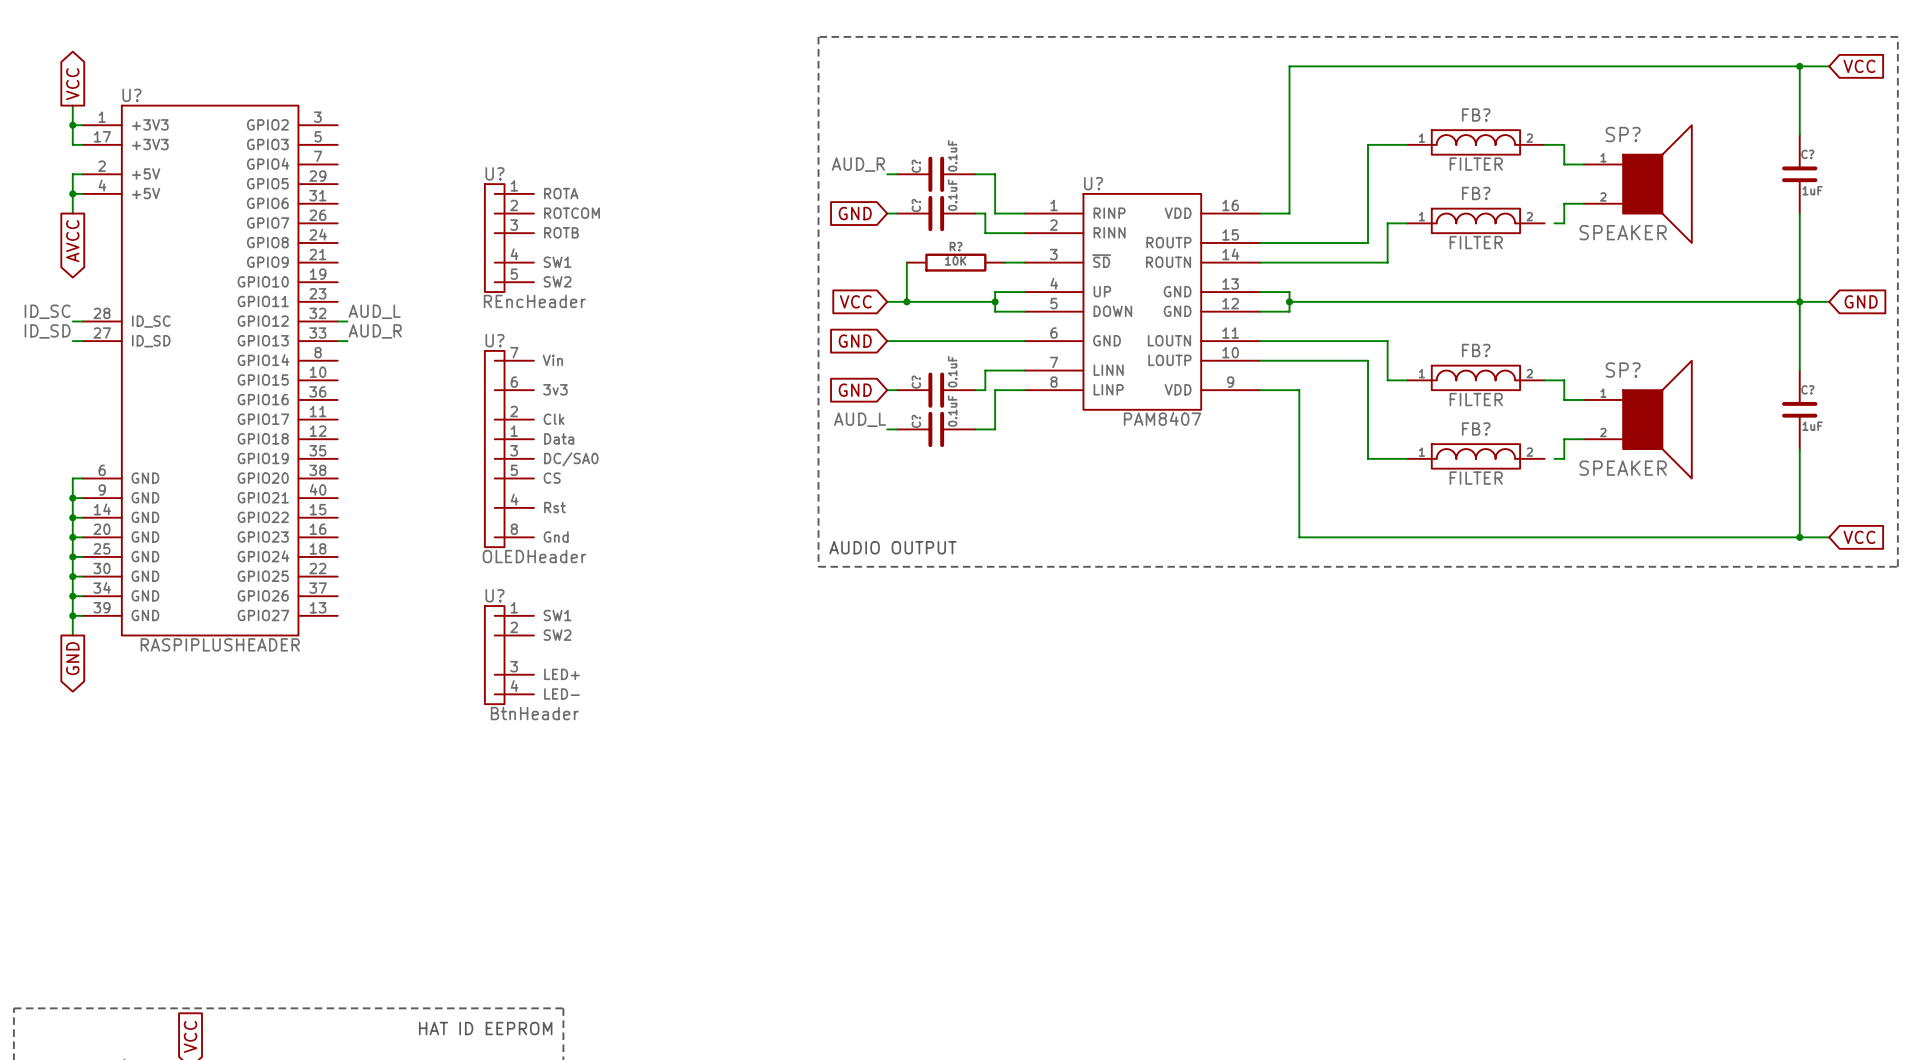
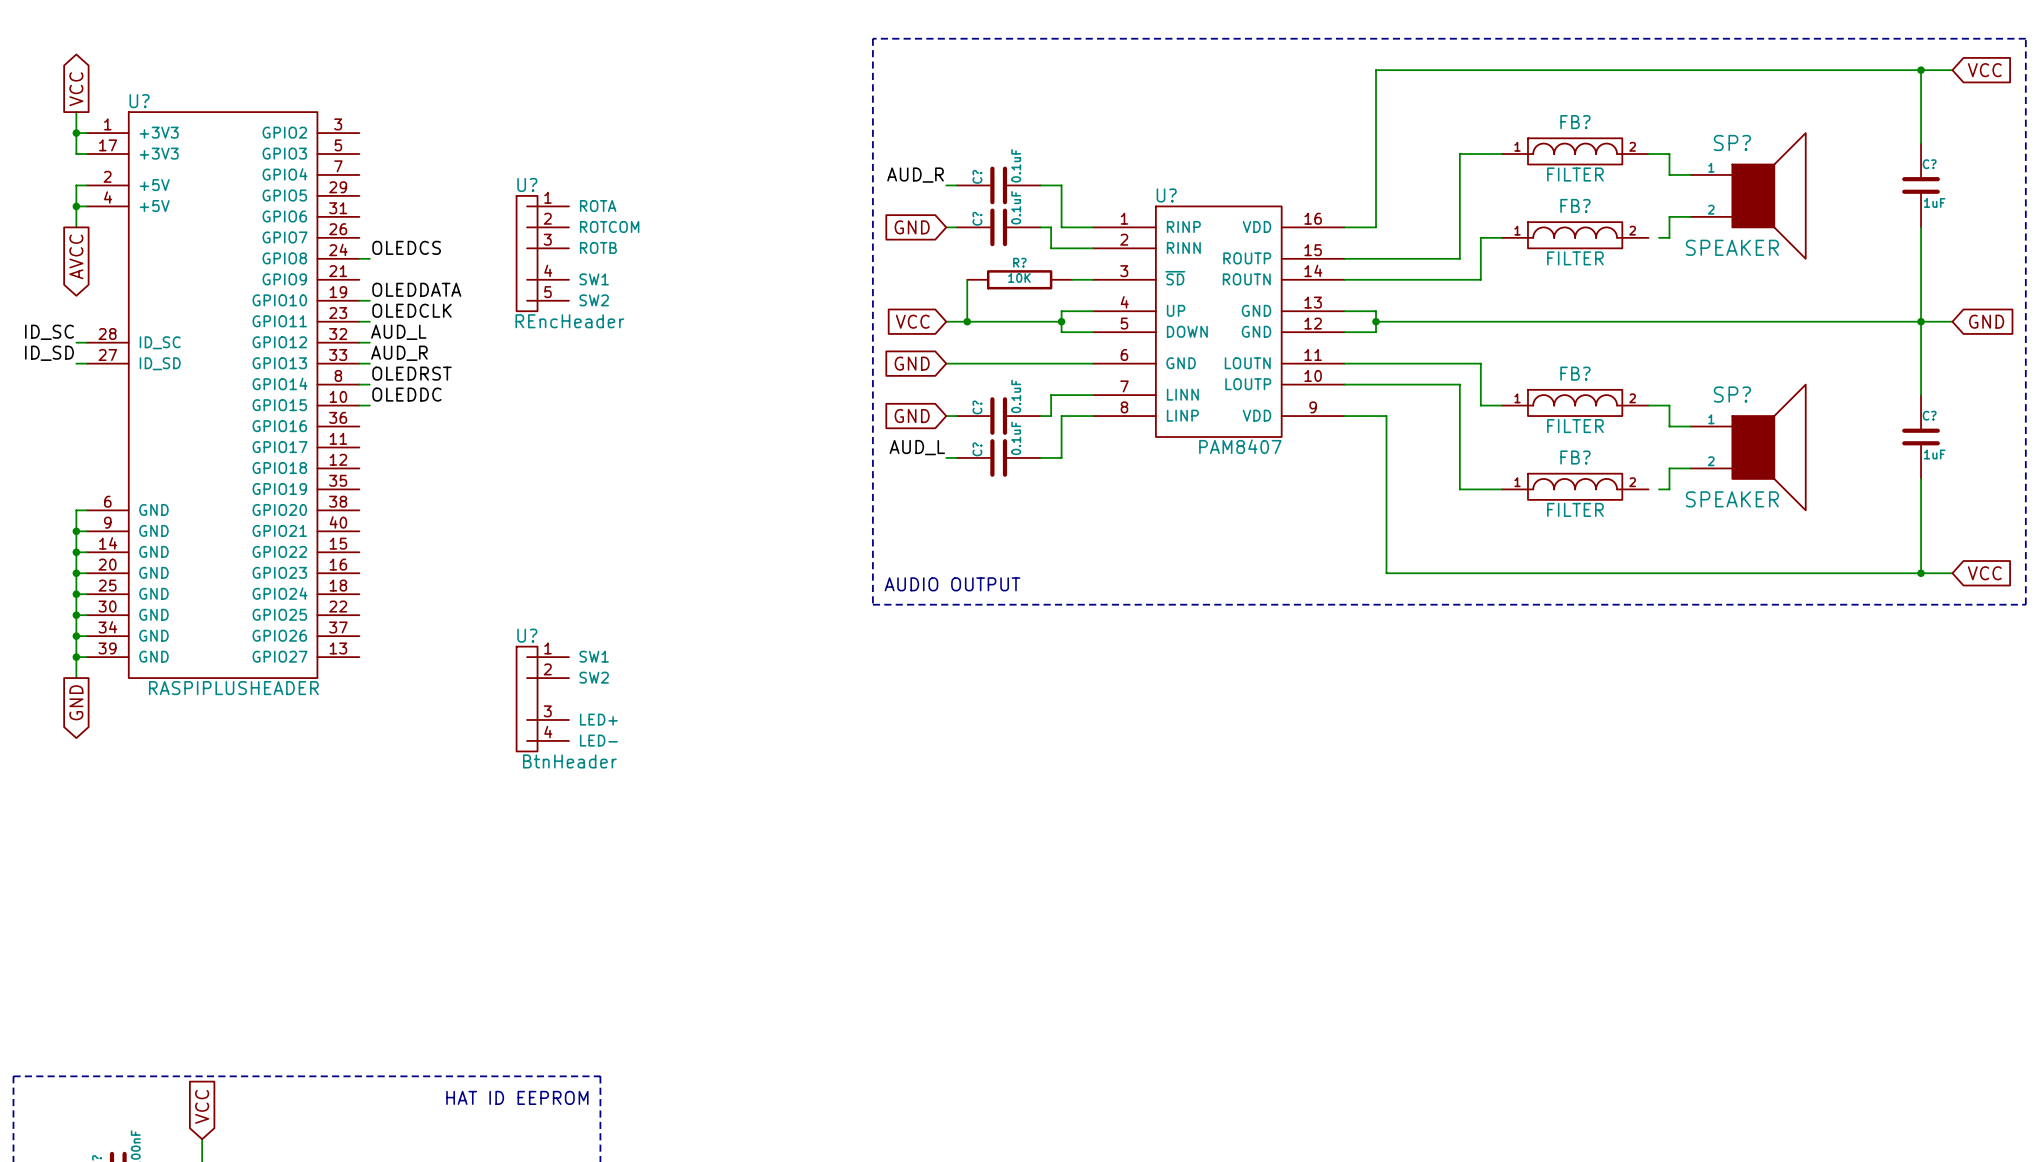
label: none -> OLEDCS (406, 247)
wire: none -> (359, 258) (369, 258)
label: none -> OLEDDATA (416, 289)
wire: none -> (359, 300) (369, 300)
label: none -> OLEDCLK (411, 310)
wire: none -> (359, 321) (369, 321)
label: none -> OLEDRST (411, 373)
wire: none -> (359, 384) (369, 384)
label: none -> OLEDDC (406, 394)
wire: none -> (359, 405) (369, 405)
U?: OLEDHeader (509, 449) -> none

